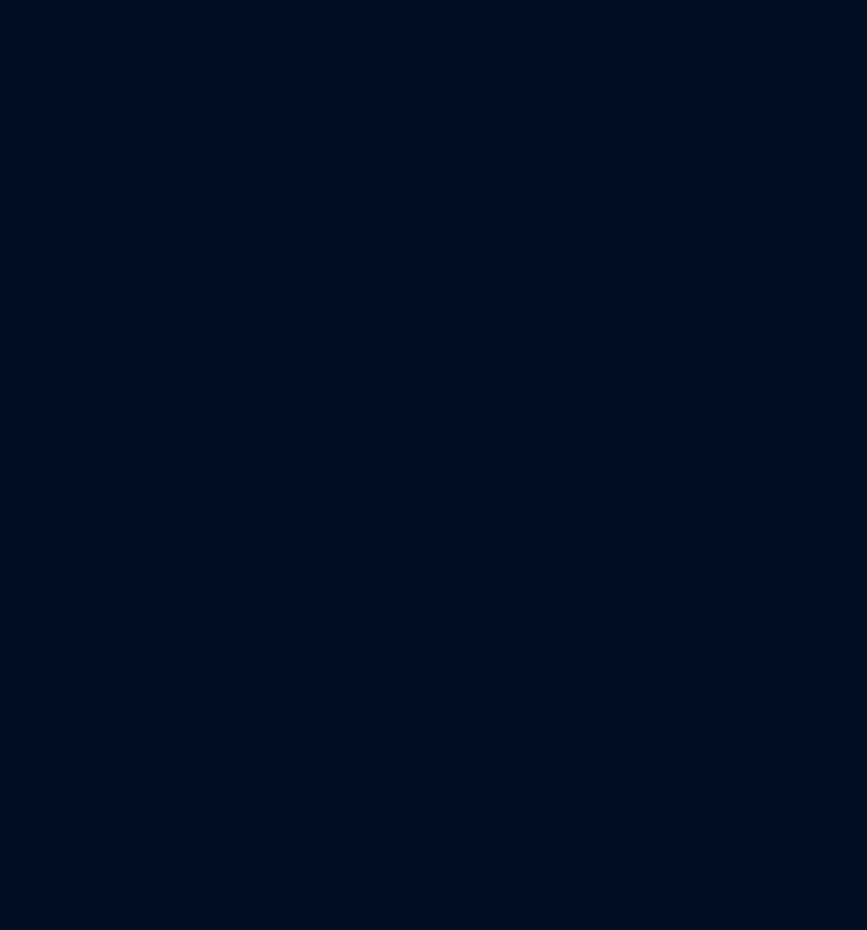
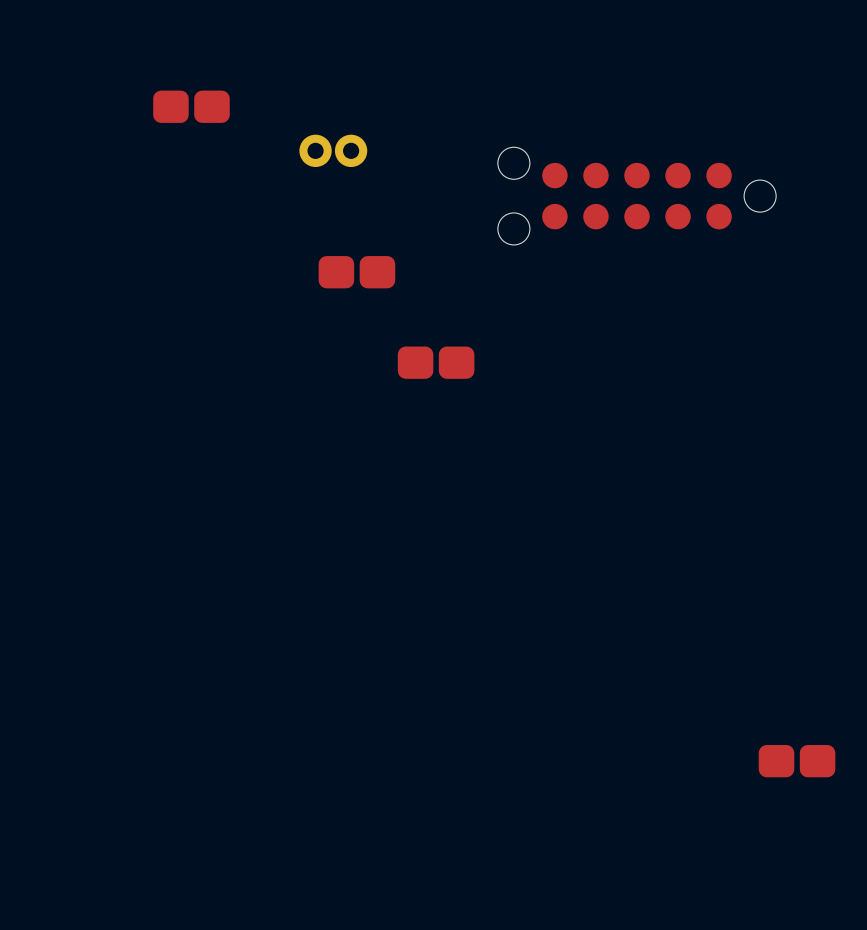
part: none -> (191, 106)
part: none -> (333, 150)
part: none -> (637, 196)
part: none -> (356, 272)
part: none -> (436, 362)
part: none -> (797, 761)

